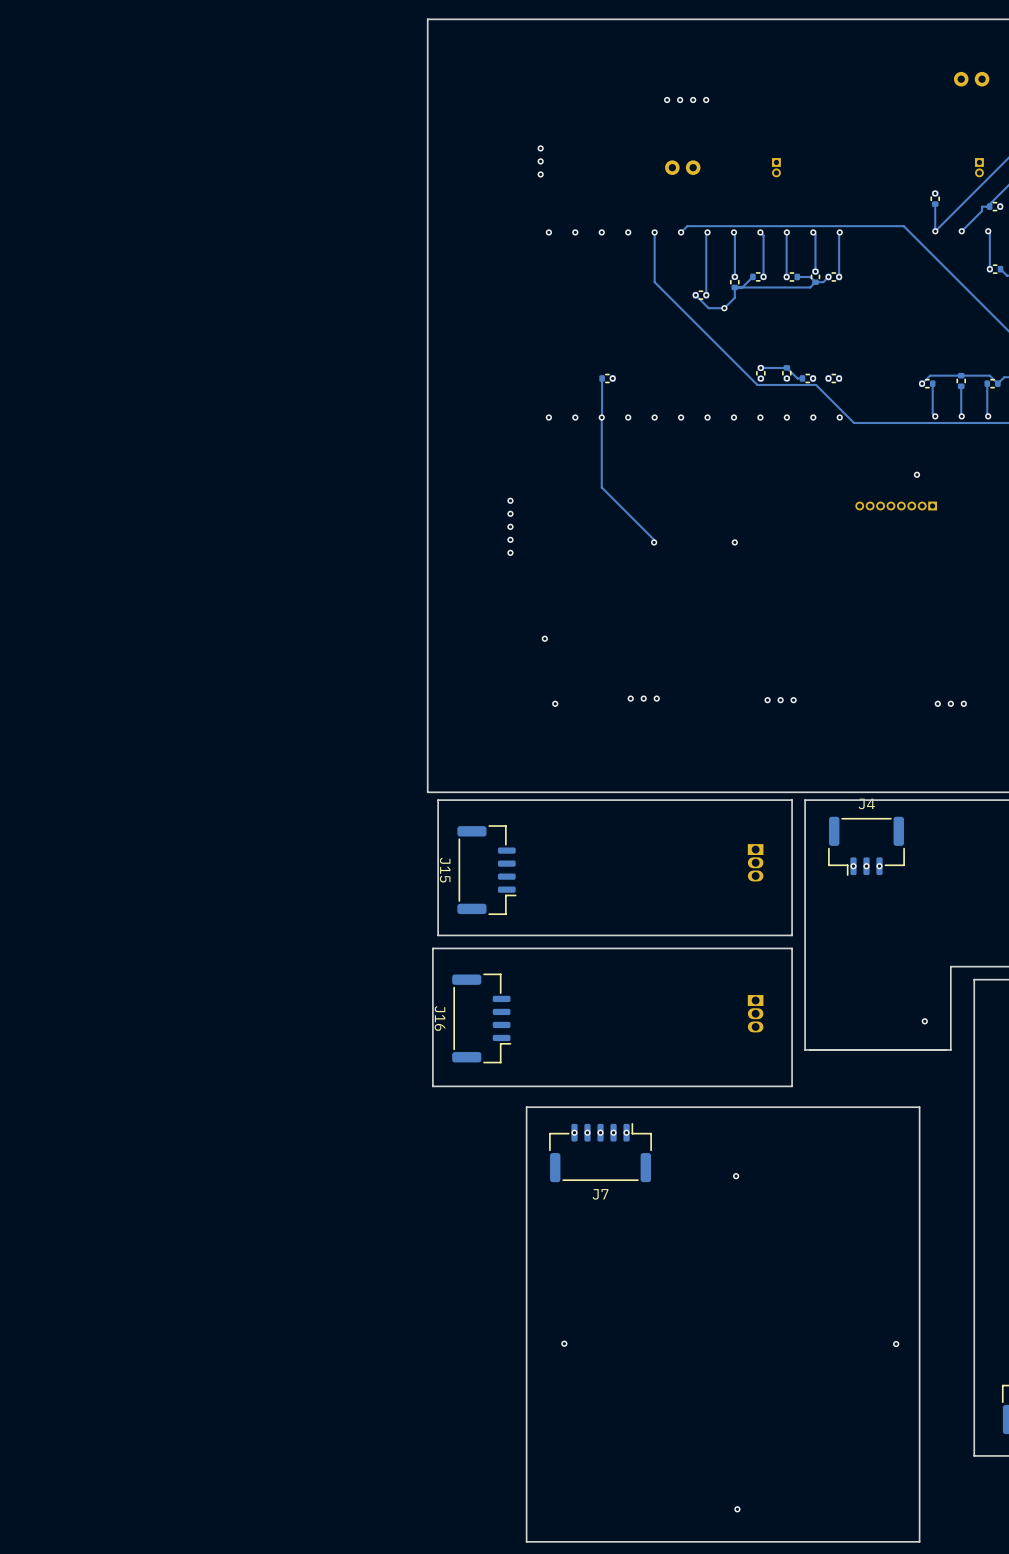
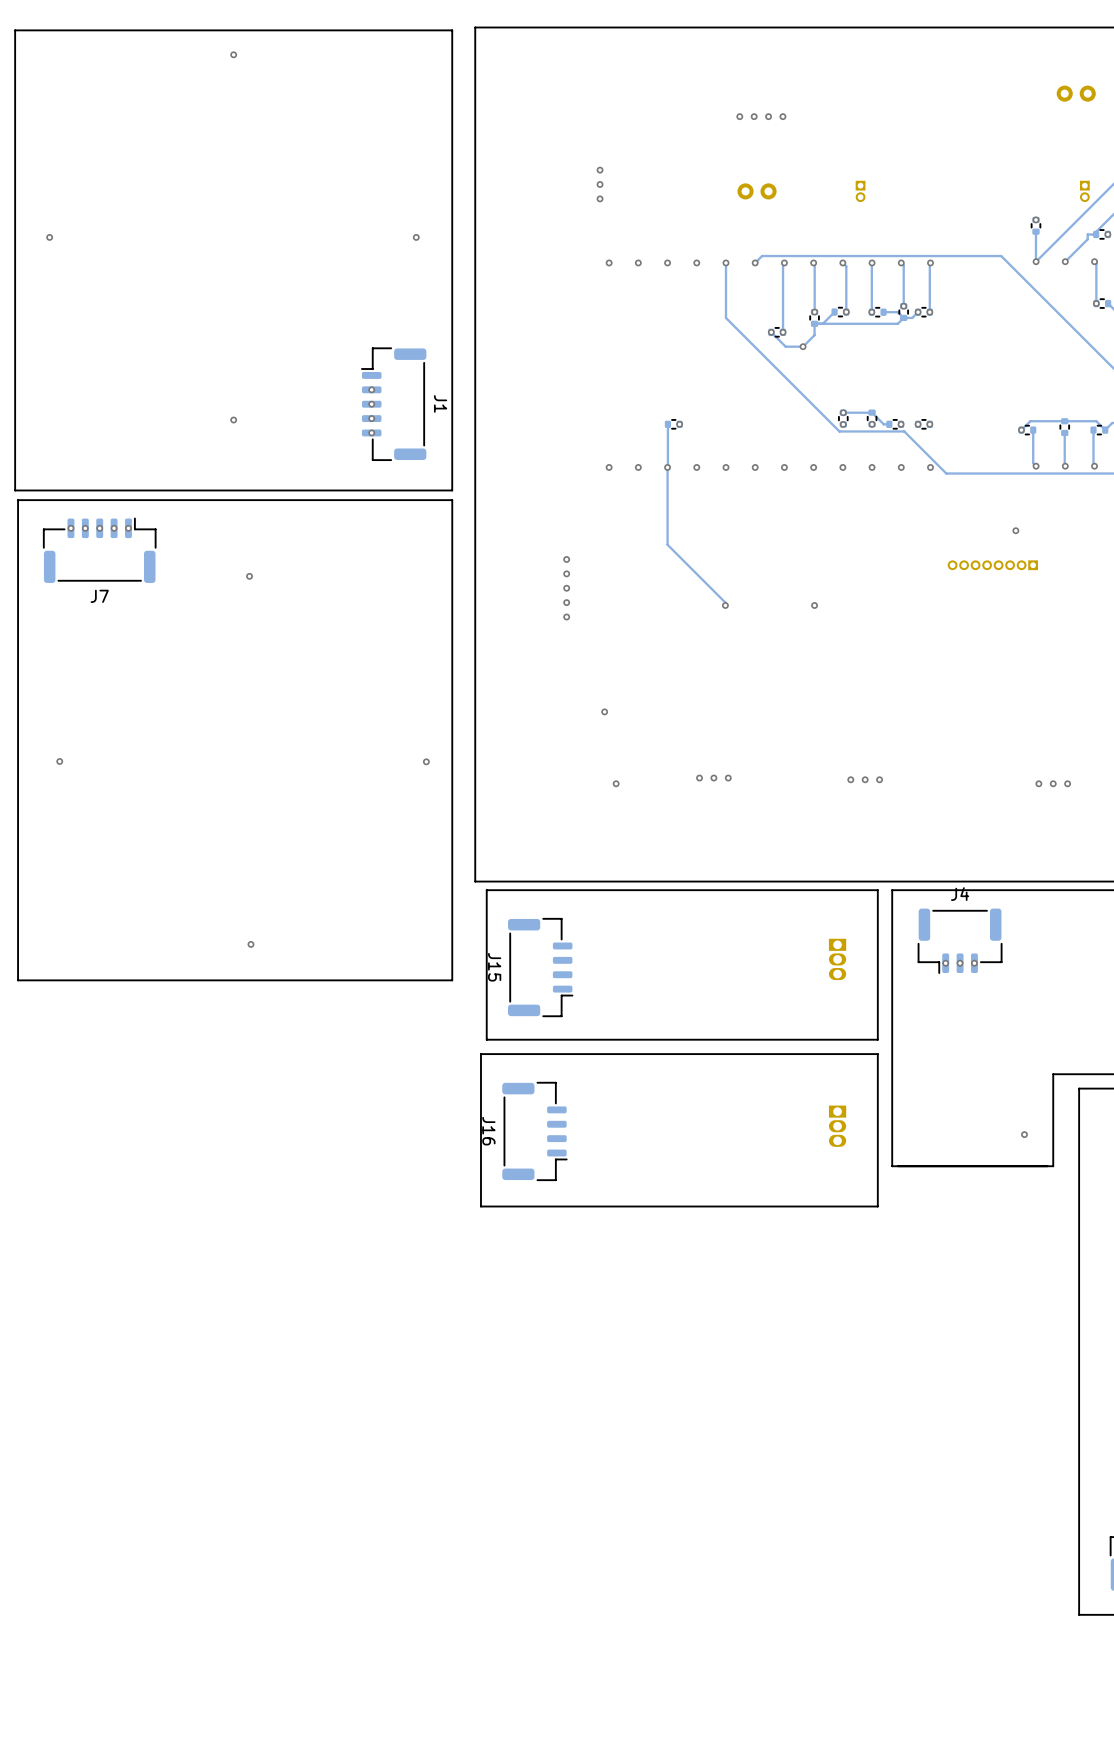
board edge: none -> (452, 30) (15, 30) (15, 490) (452, 490) (452, 30)
via: none -> (233, 54)
via: none -> (49, 237)
via: none -> (416, 237)
via: none -> (371, 389)
via: none -> (371, 404)
J1: none -> (393, 404)
via: none -> (371, 418)
via: none -> (233, 420)
via: none -> (371, 432)
board edge: none -> (452, 500) (452, 980) (18, 980) (18, 500) (452, 500)
via: none -> (70, 528)
via: none -> (85, 528)
via: none -> (99, 528)
via: none -> (114, 528)
via: none -> (128, 528)
via: none -> (249, 576)
via: none -> (59, 761)
via: none -> (426, 761)
via: none -> (250, 944)
board edge: (919, 1107) (526, 1107) (526, 1541) (919, 1541) (919, 1107) -> none
via: (574, 1132) -> none
via: (587, 1132) -> none
via: (600, 1132) -> none
via: (613, 1132) -> none
via: (626, 1132) -> none
J7 position: (600, 1152) -> (99, 550)
via: (736, 1176) -> none
via: (564, 1343) -> none
via: (896, 1344) -> none
via: (737, 1509) -> none

